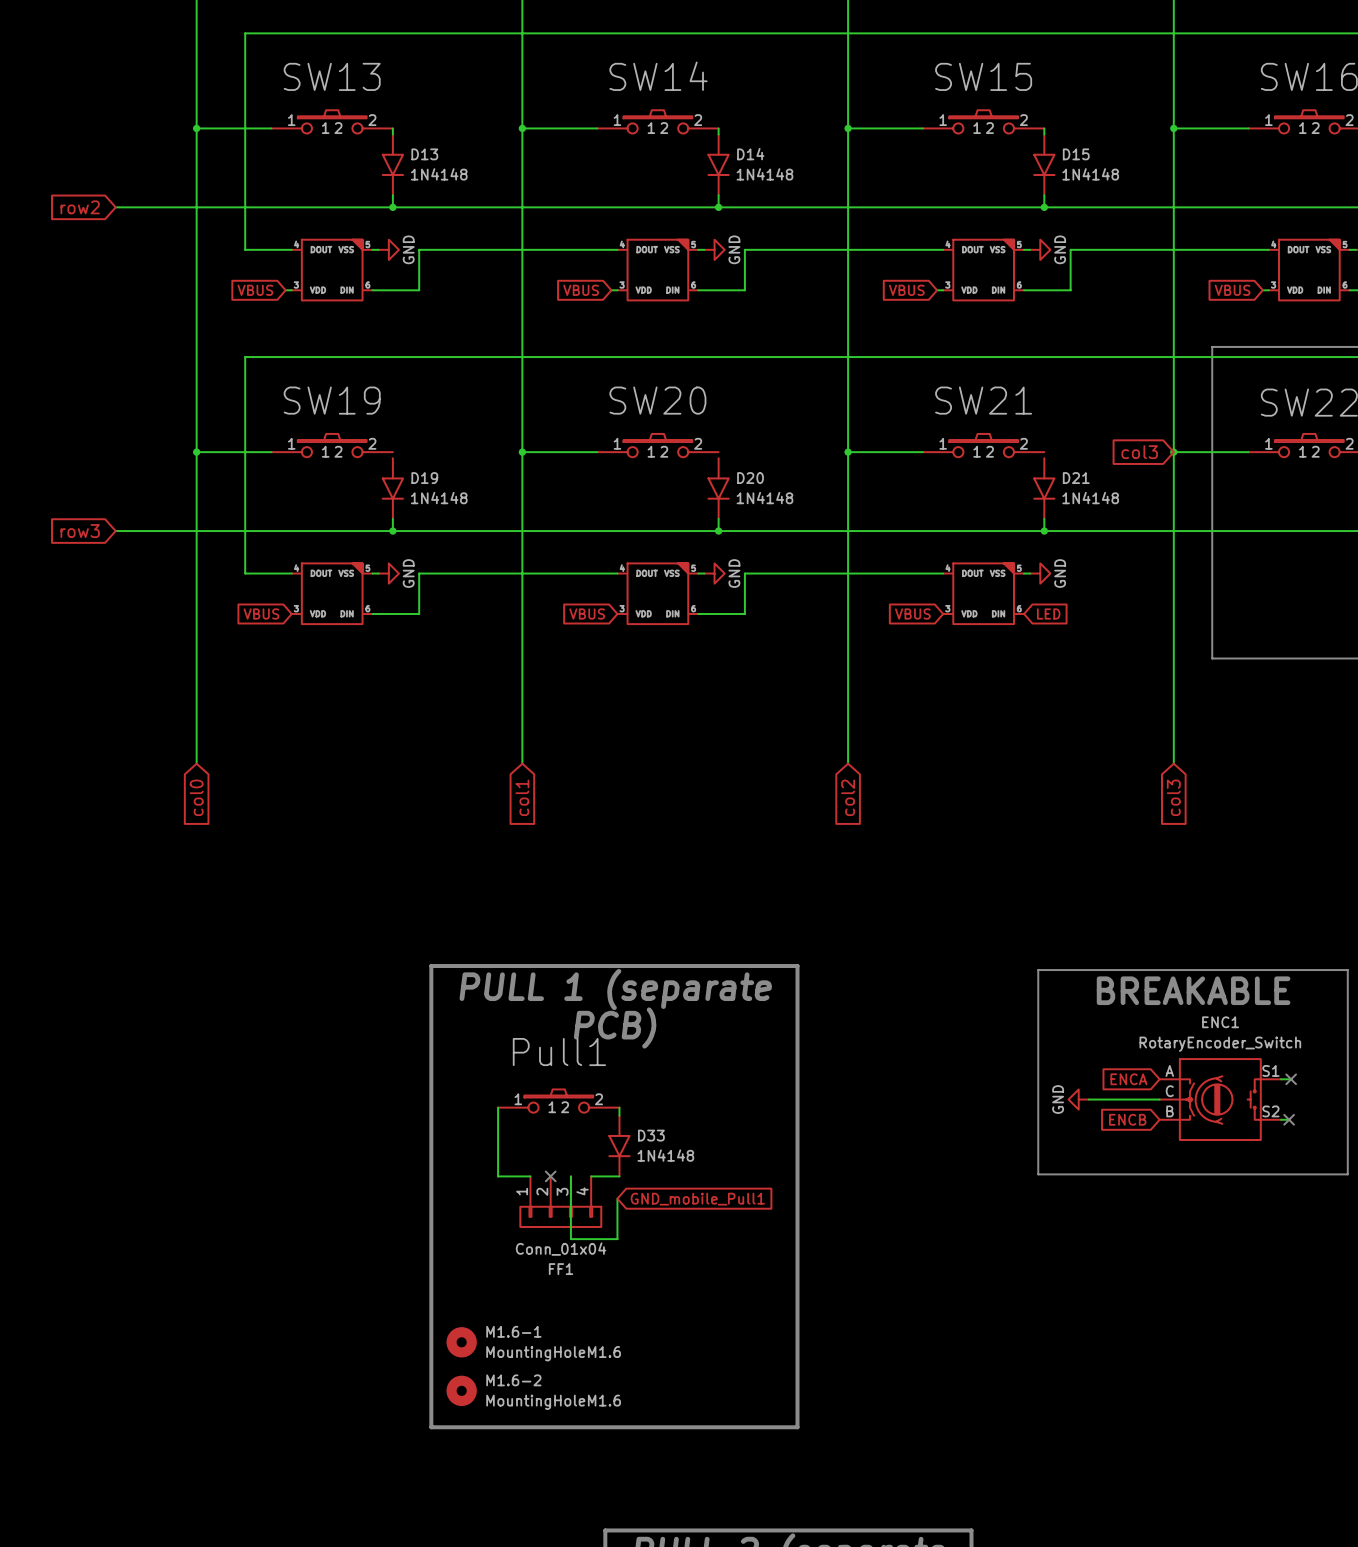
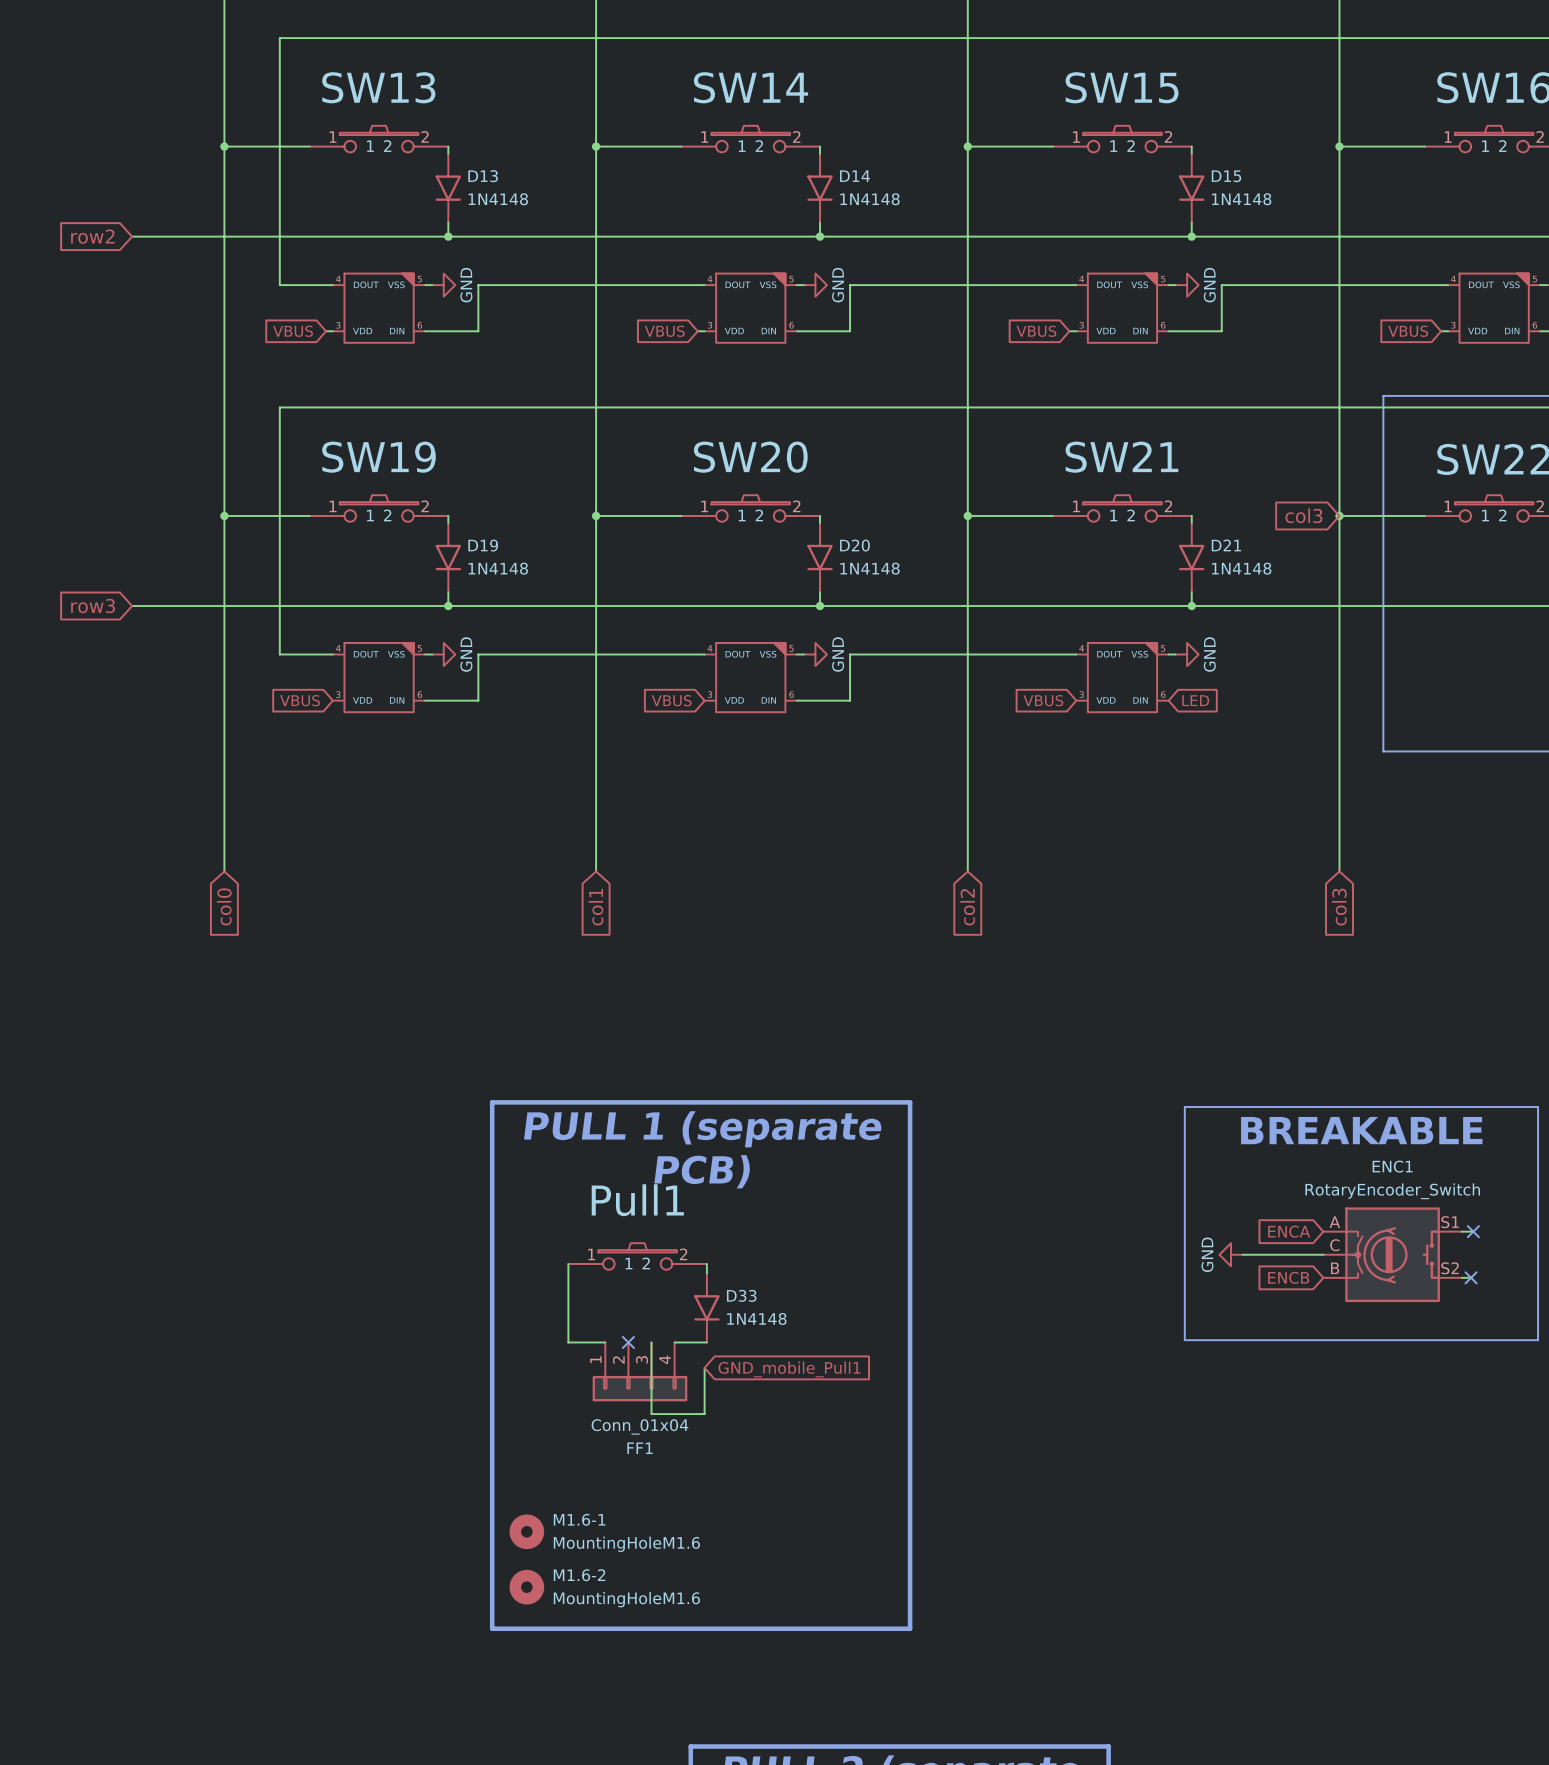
wire: none -> (448, 515) (448, 522)
wire: none -> (820, 515) (820, 522)
wire: none -> (1191, 515) (1191, 522)

